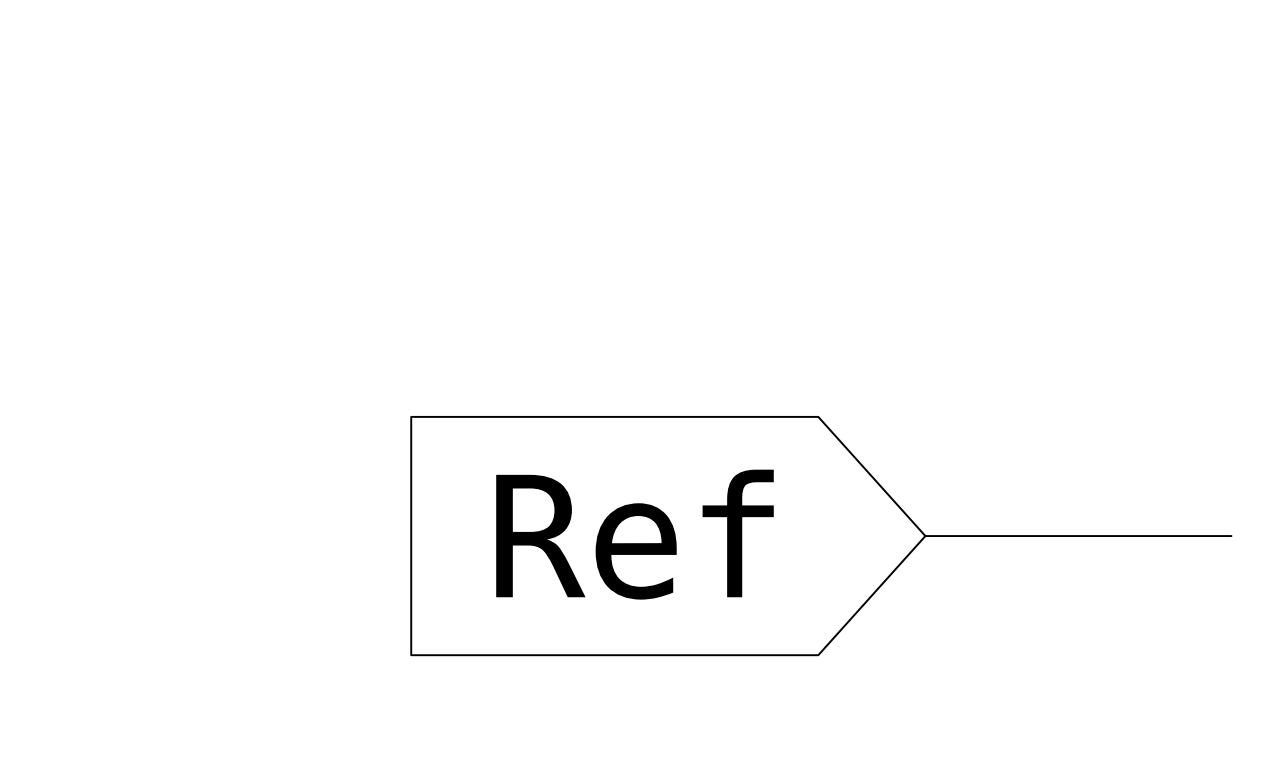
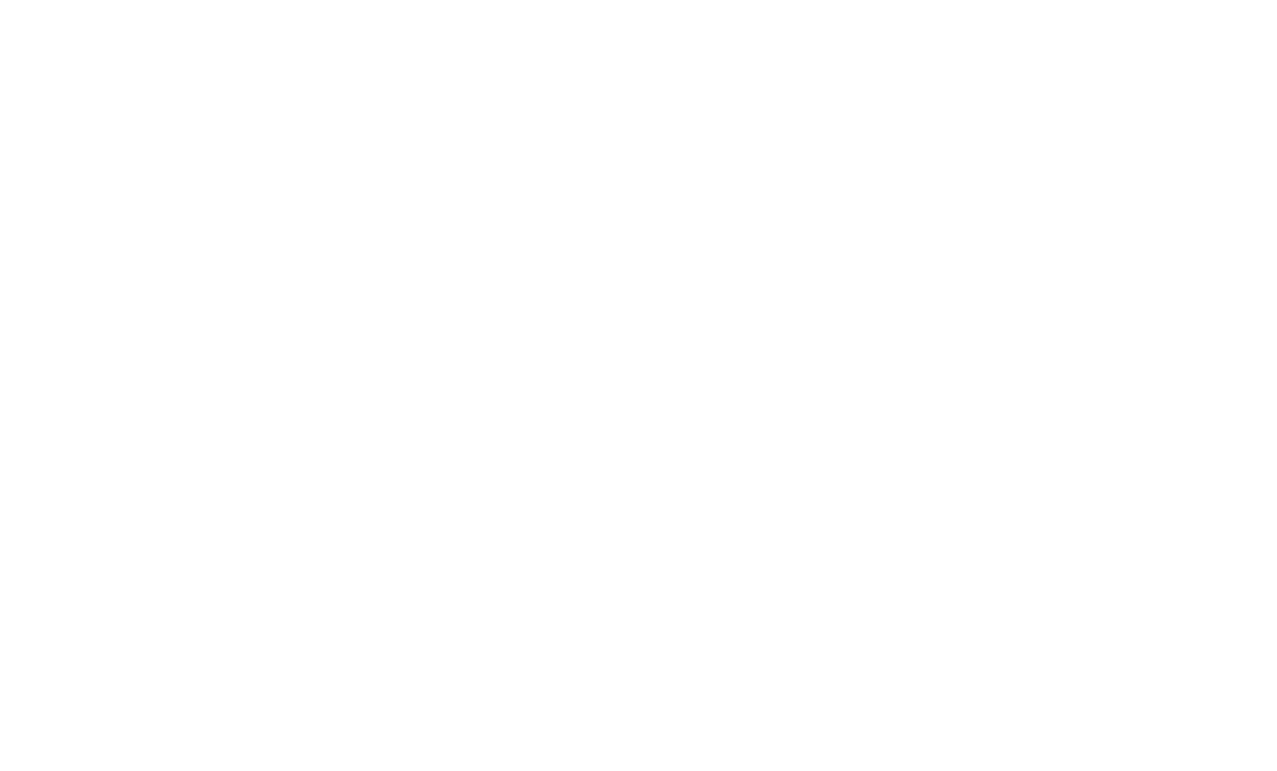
global label: Ref (634, 534) -> none
wire: (925, 536) (1231, 536) -> none

